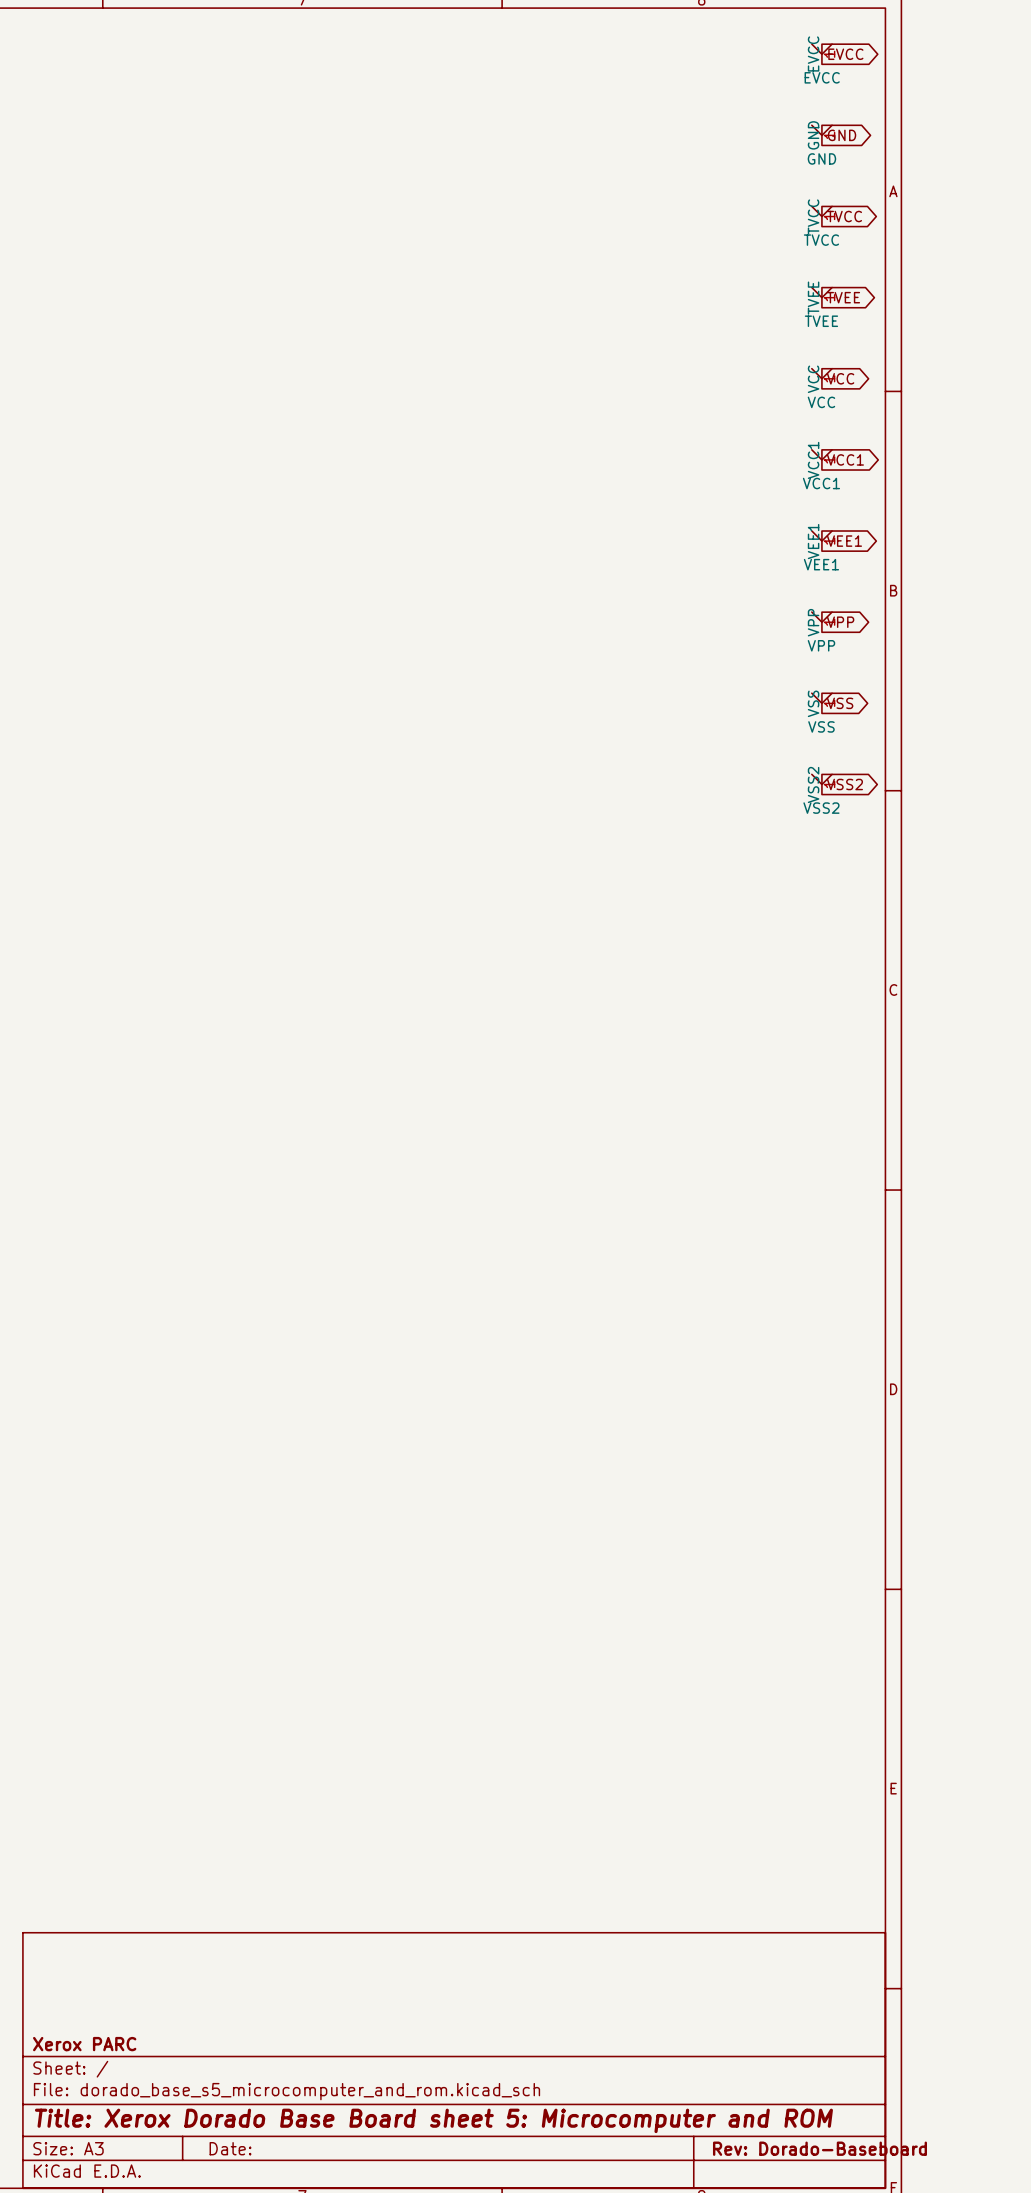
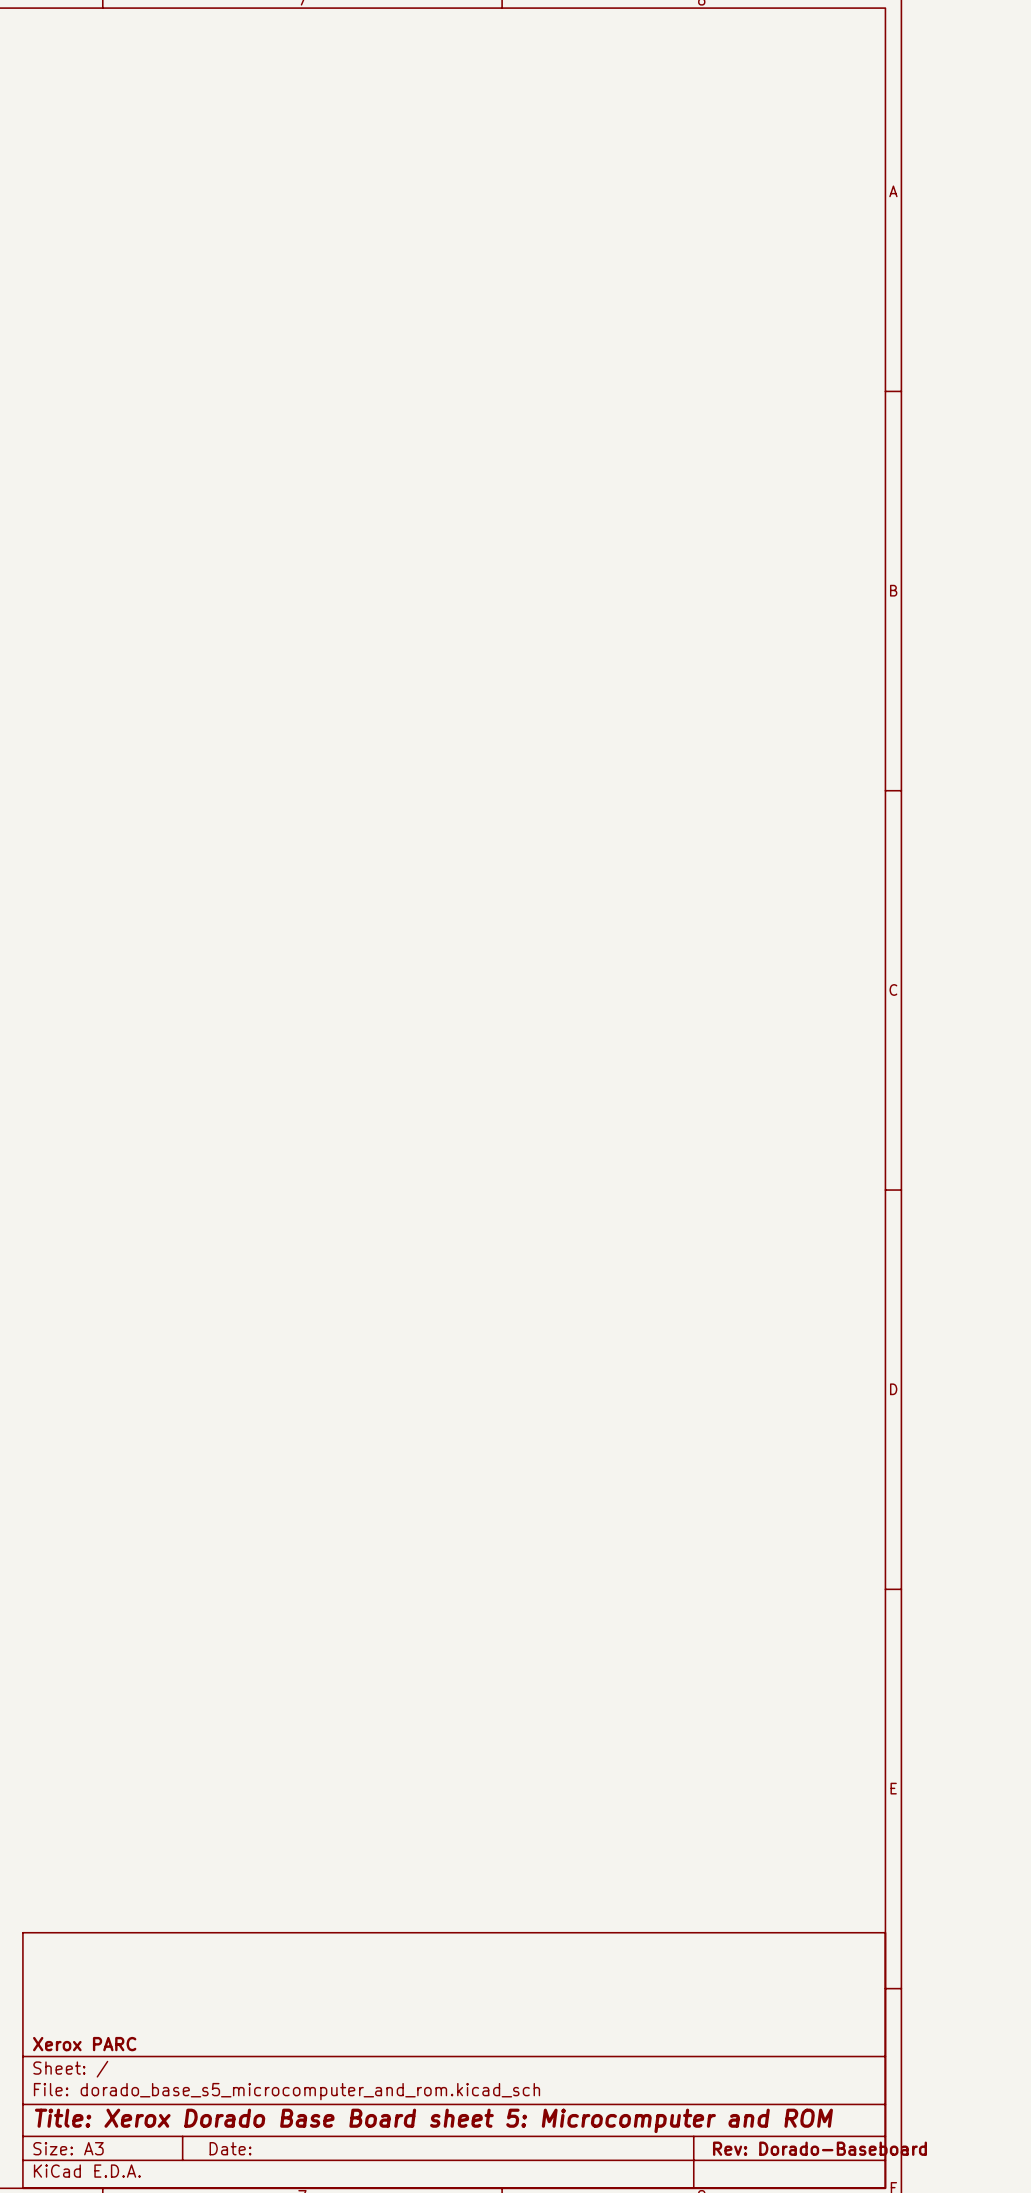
power symbol: EVCC (821, 49) -> none
global label: EVCC (845, 54) -> none
power symbol: GND (821, 130) -> none
global label: GND (842, 135) -> none
power symbol: TVCC (821, 211) -> none
global label: TVCC (844, 216) -> none
power symbol: TVEE (821, 292) -> none
global label: TVEE (843, 297) -> none
power symbol: VCC (821, 373) -> none
global label: VCC (840, 378) -> none
power symbol: VCC1 (821, 454) -> none
global label: VCC1 (845, 459) -> none
power symbol: VEE1 (821, 536) -> none
global label: VEE1 (844, 541) -> none
power symbol: VPP (821, 617) -> none
global label: VPP (840, 622) -> none
power symbol: VSS (821, 698) -> none
global label: VSS (840, 703) -> none
power symbol: VSS2 (821, 779) -> none
global label: VSS2 (844, 784) -> none

